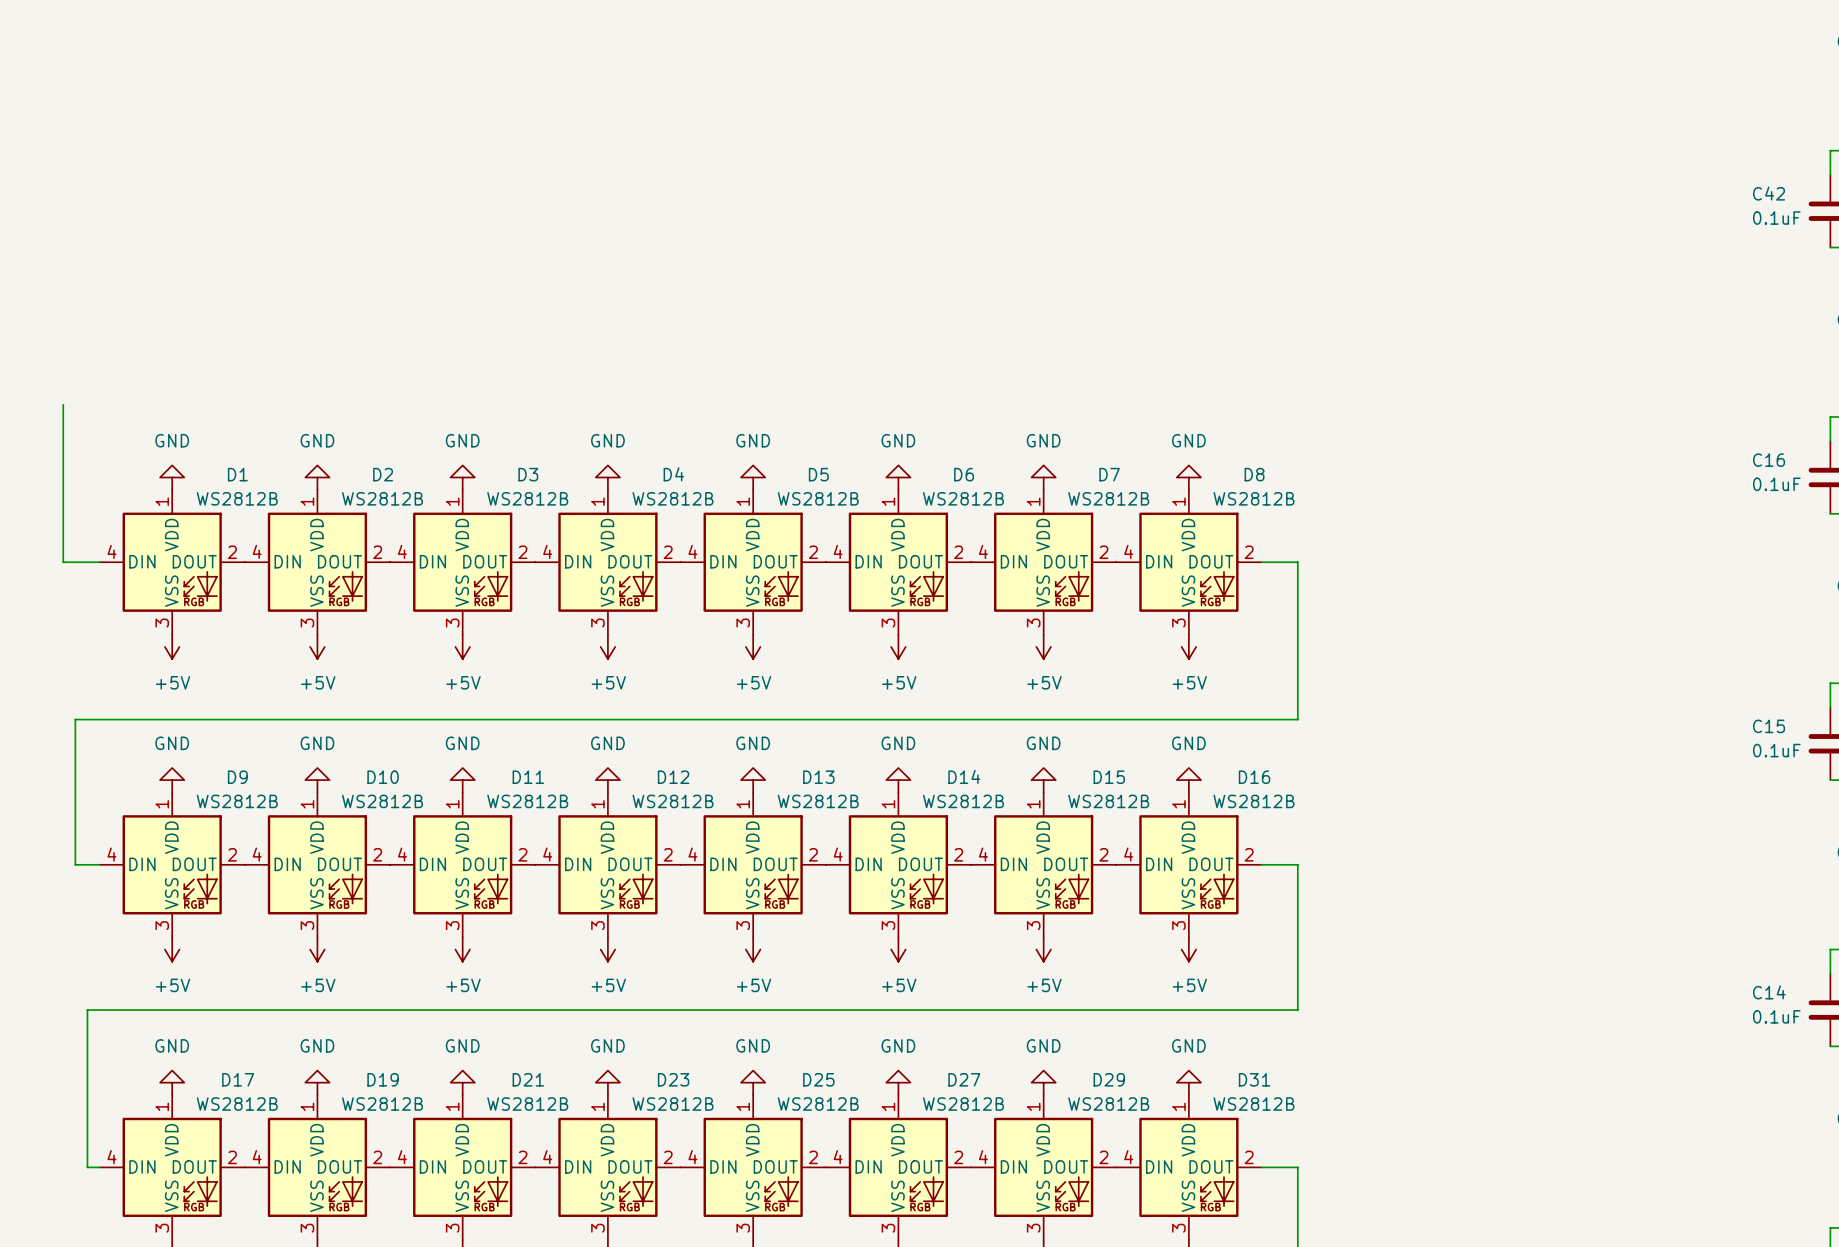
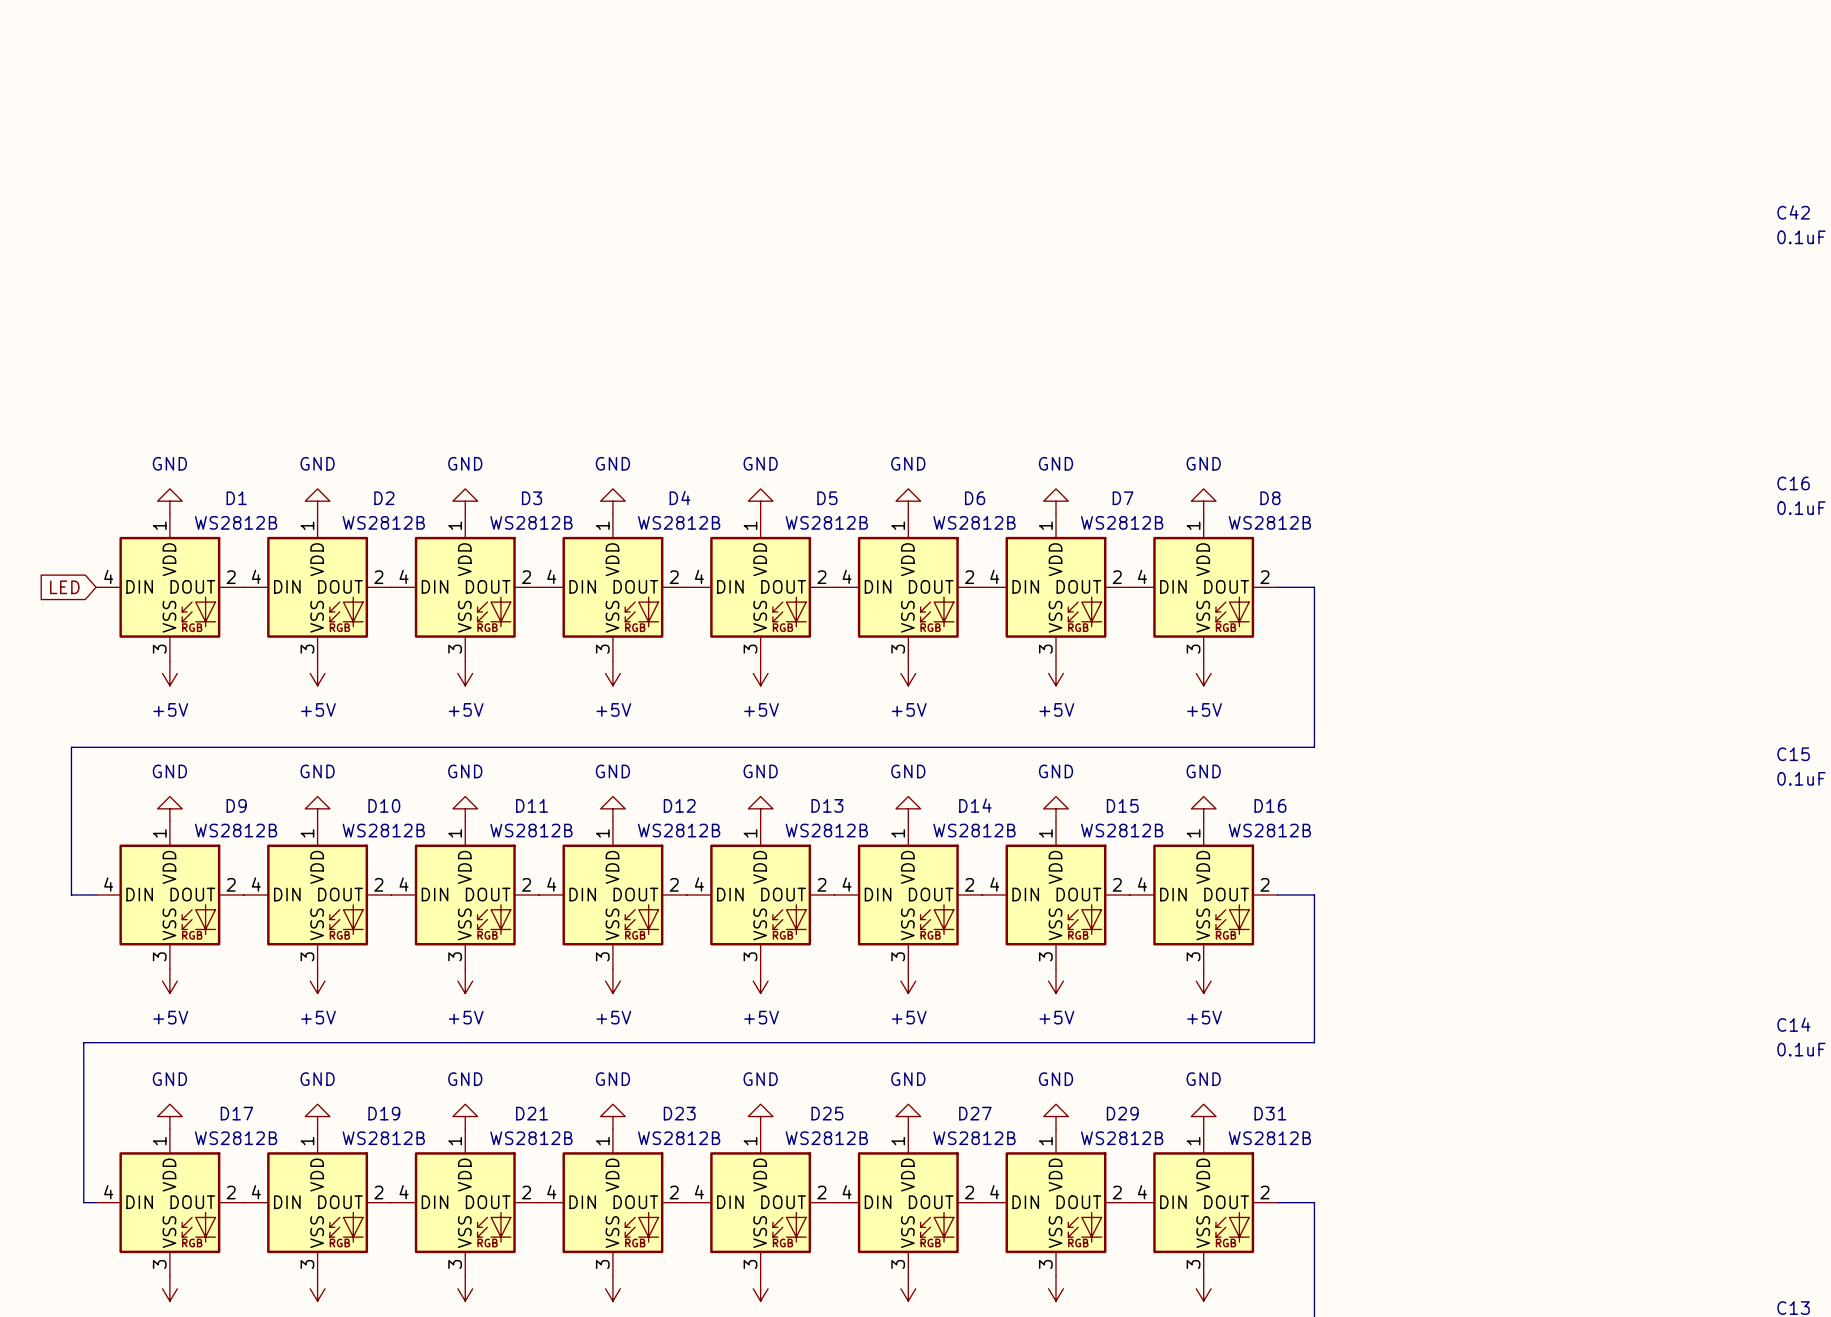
wire: (63, 404) (63, 562) (99, 562) -> none
global label: none -> LED (64, 587)

